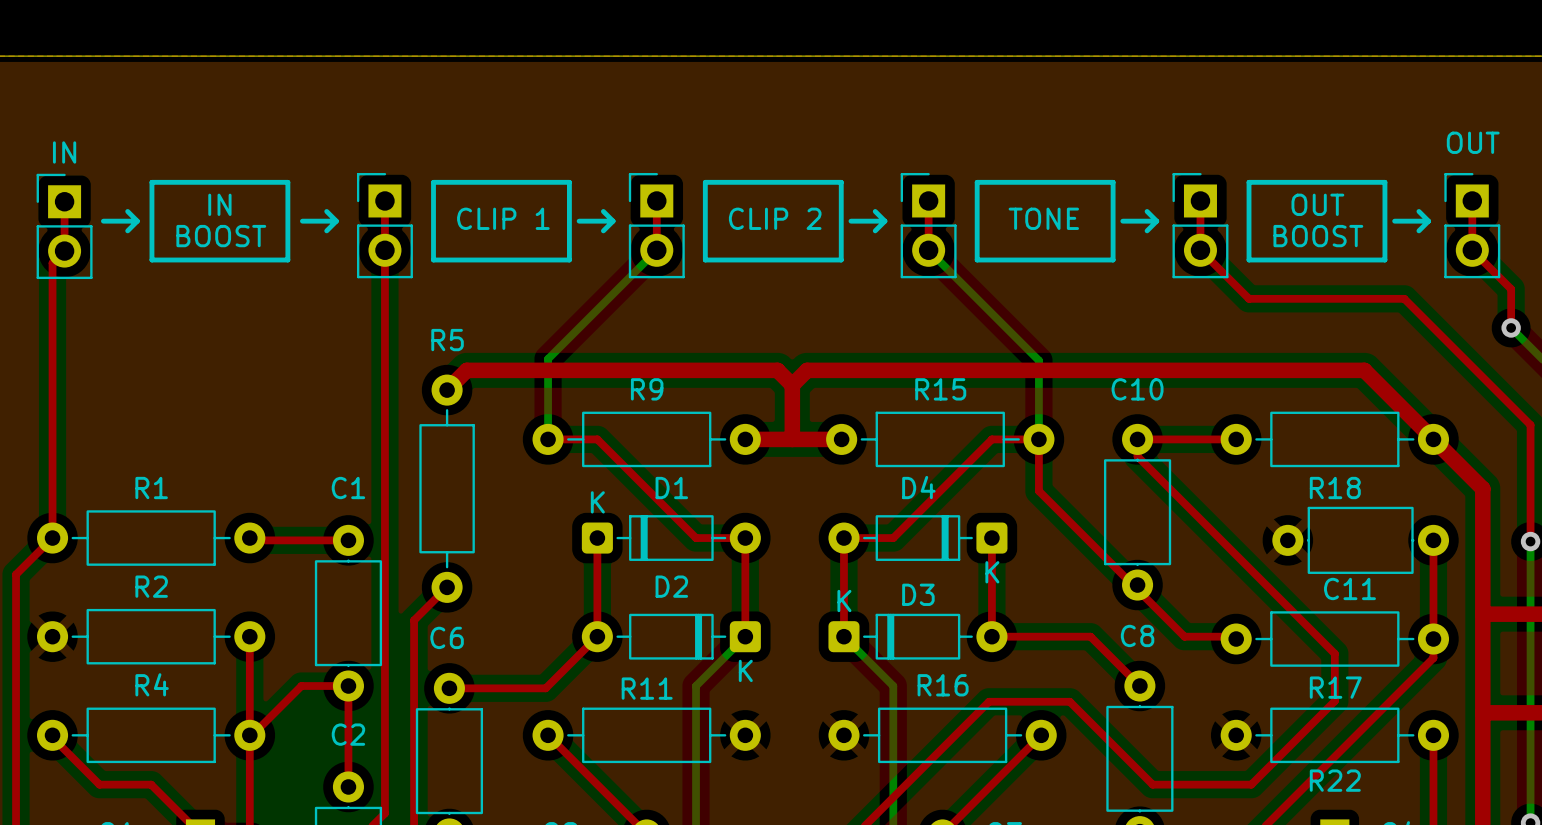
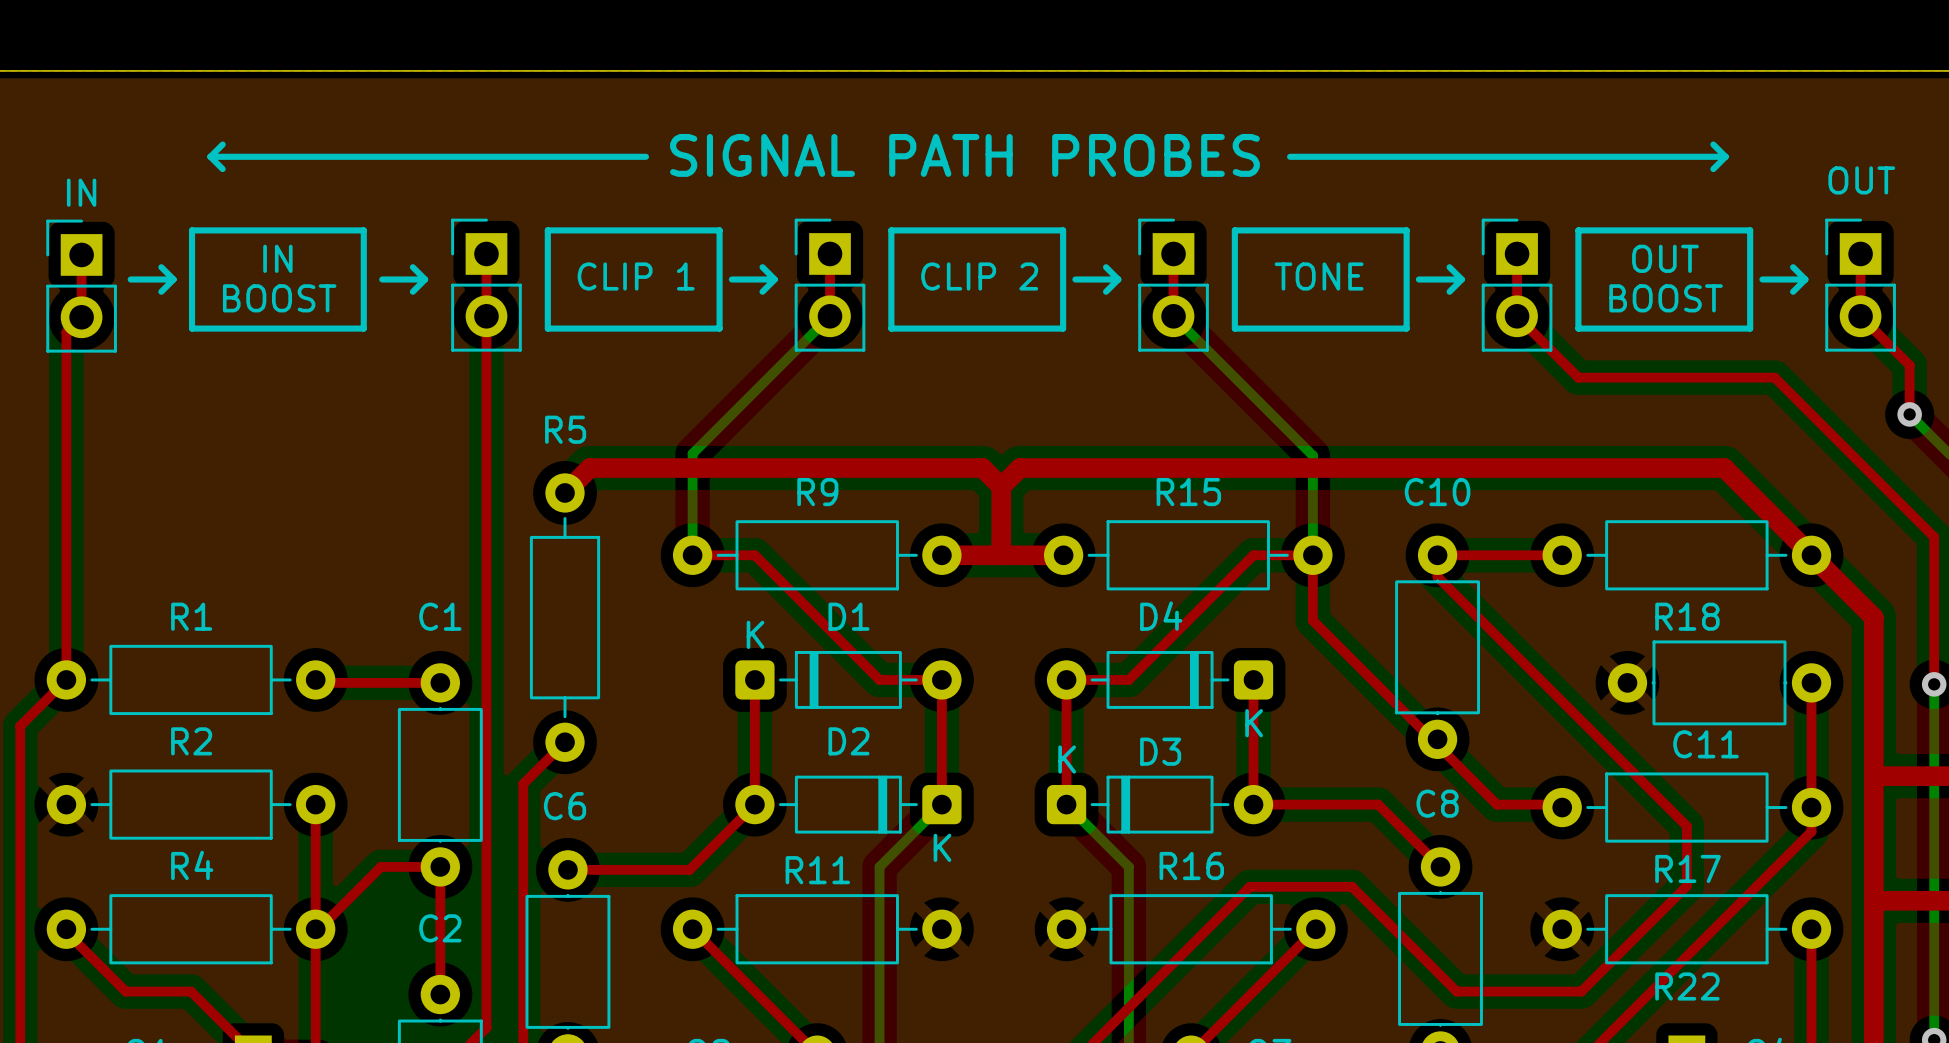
line: none -> (222, 144) (210, 156)
line: none -> (1713, 144) (1725, 156)
text: none -> SIGNAL PATH PROBES (964, 155)
line: none -> (210, 156) (645, 156)
line: none -> (210, 156) (222, 169)
line: none -> (1290, 156) (1725, 156)
line: none -> (1725, 156) (1713, 169)

